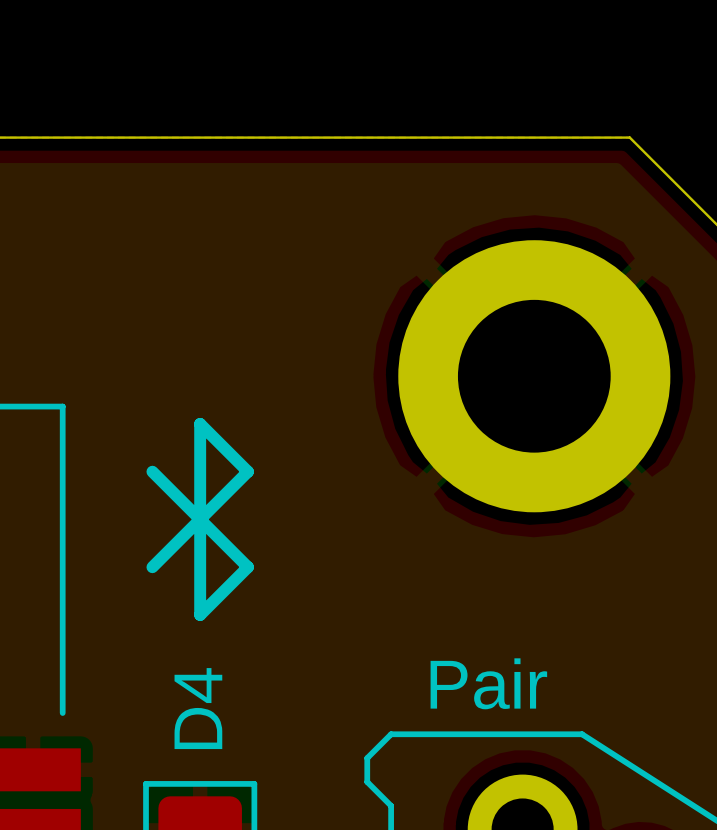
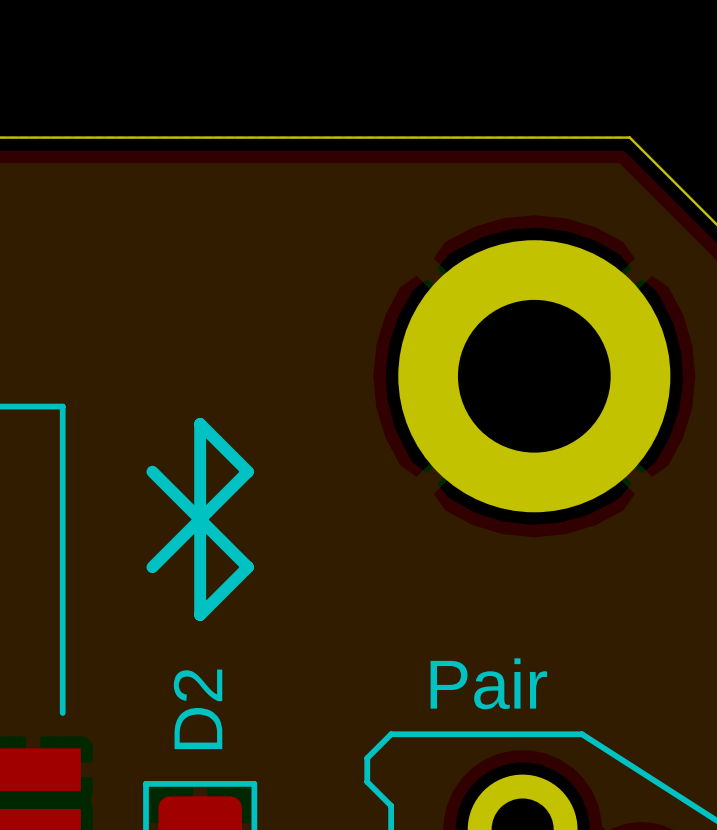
D4 name: D4 (198, 708) -> D2 (198, 709)

